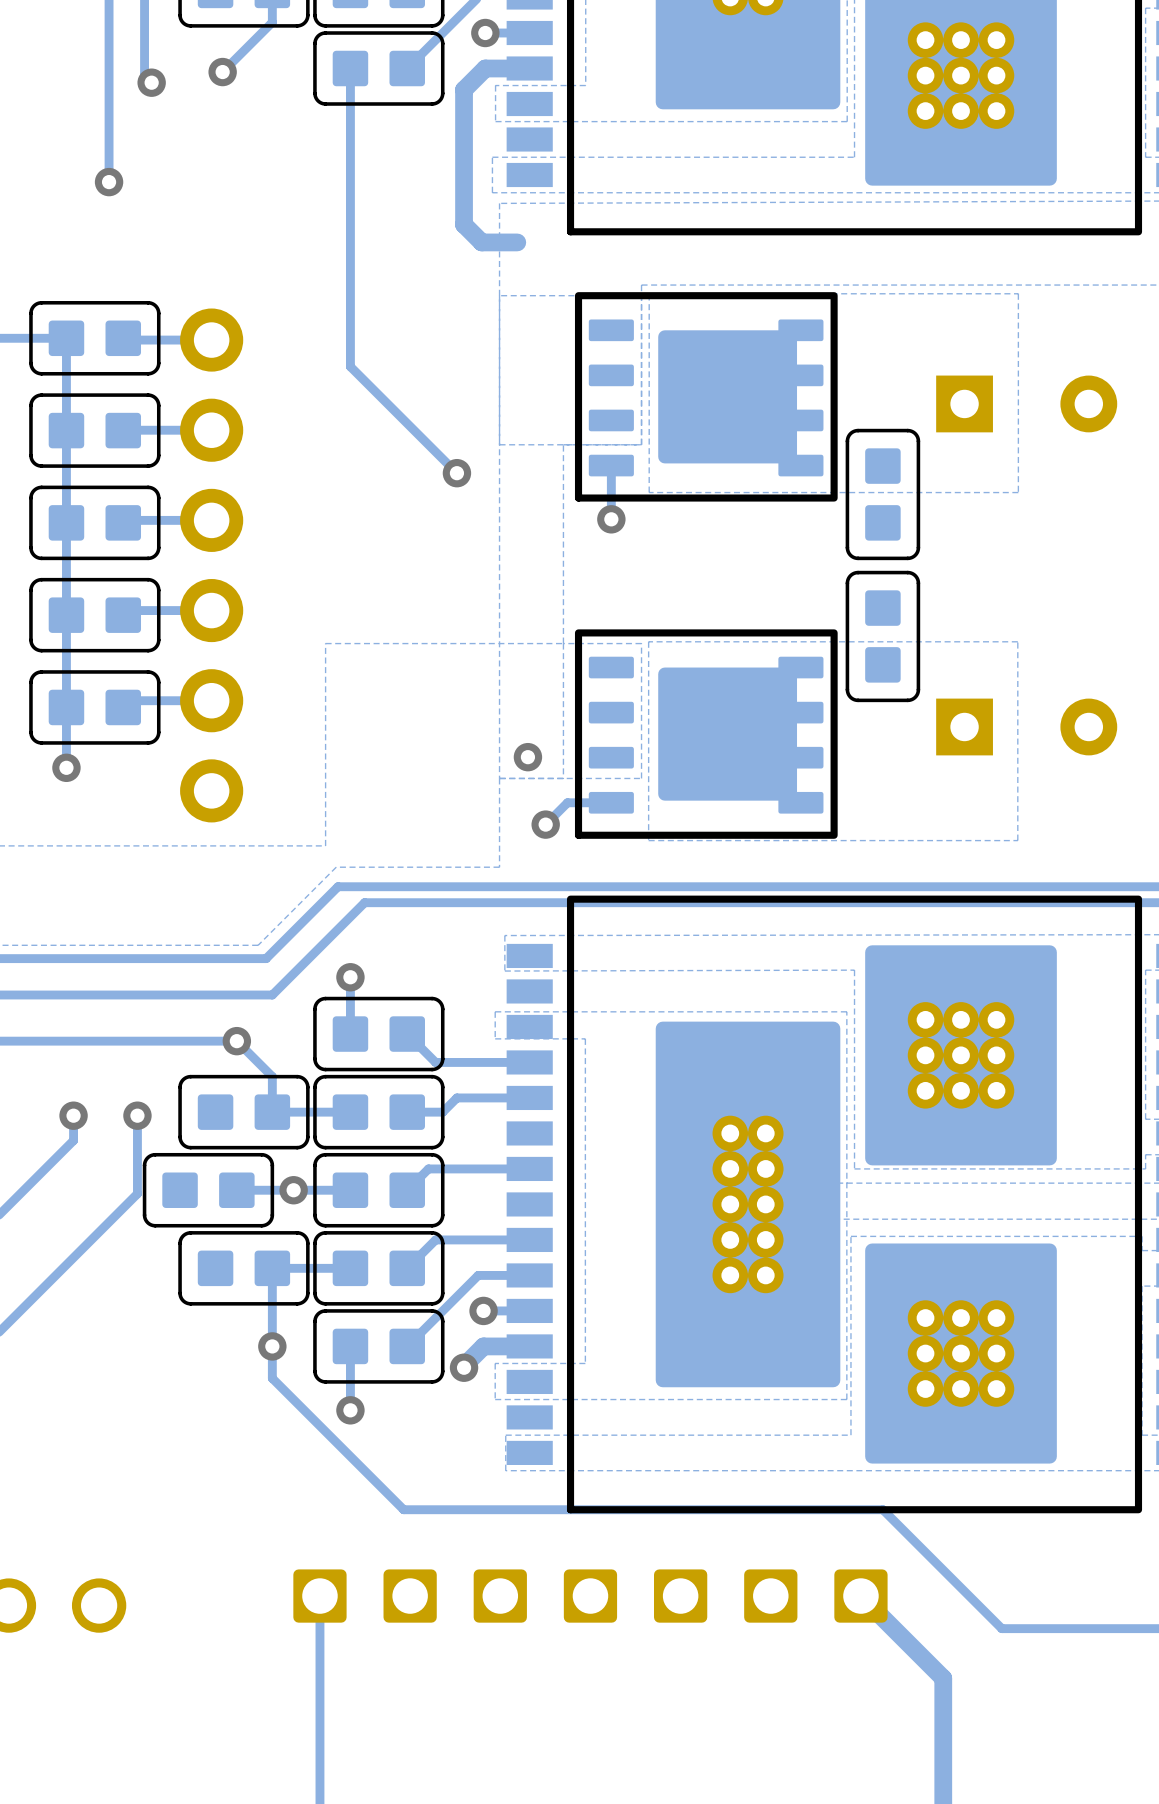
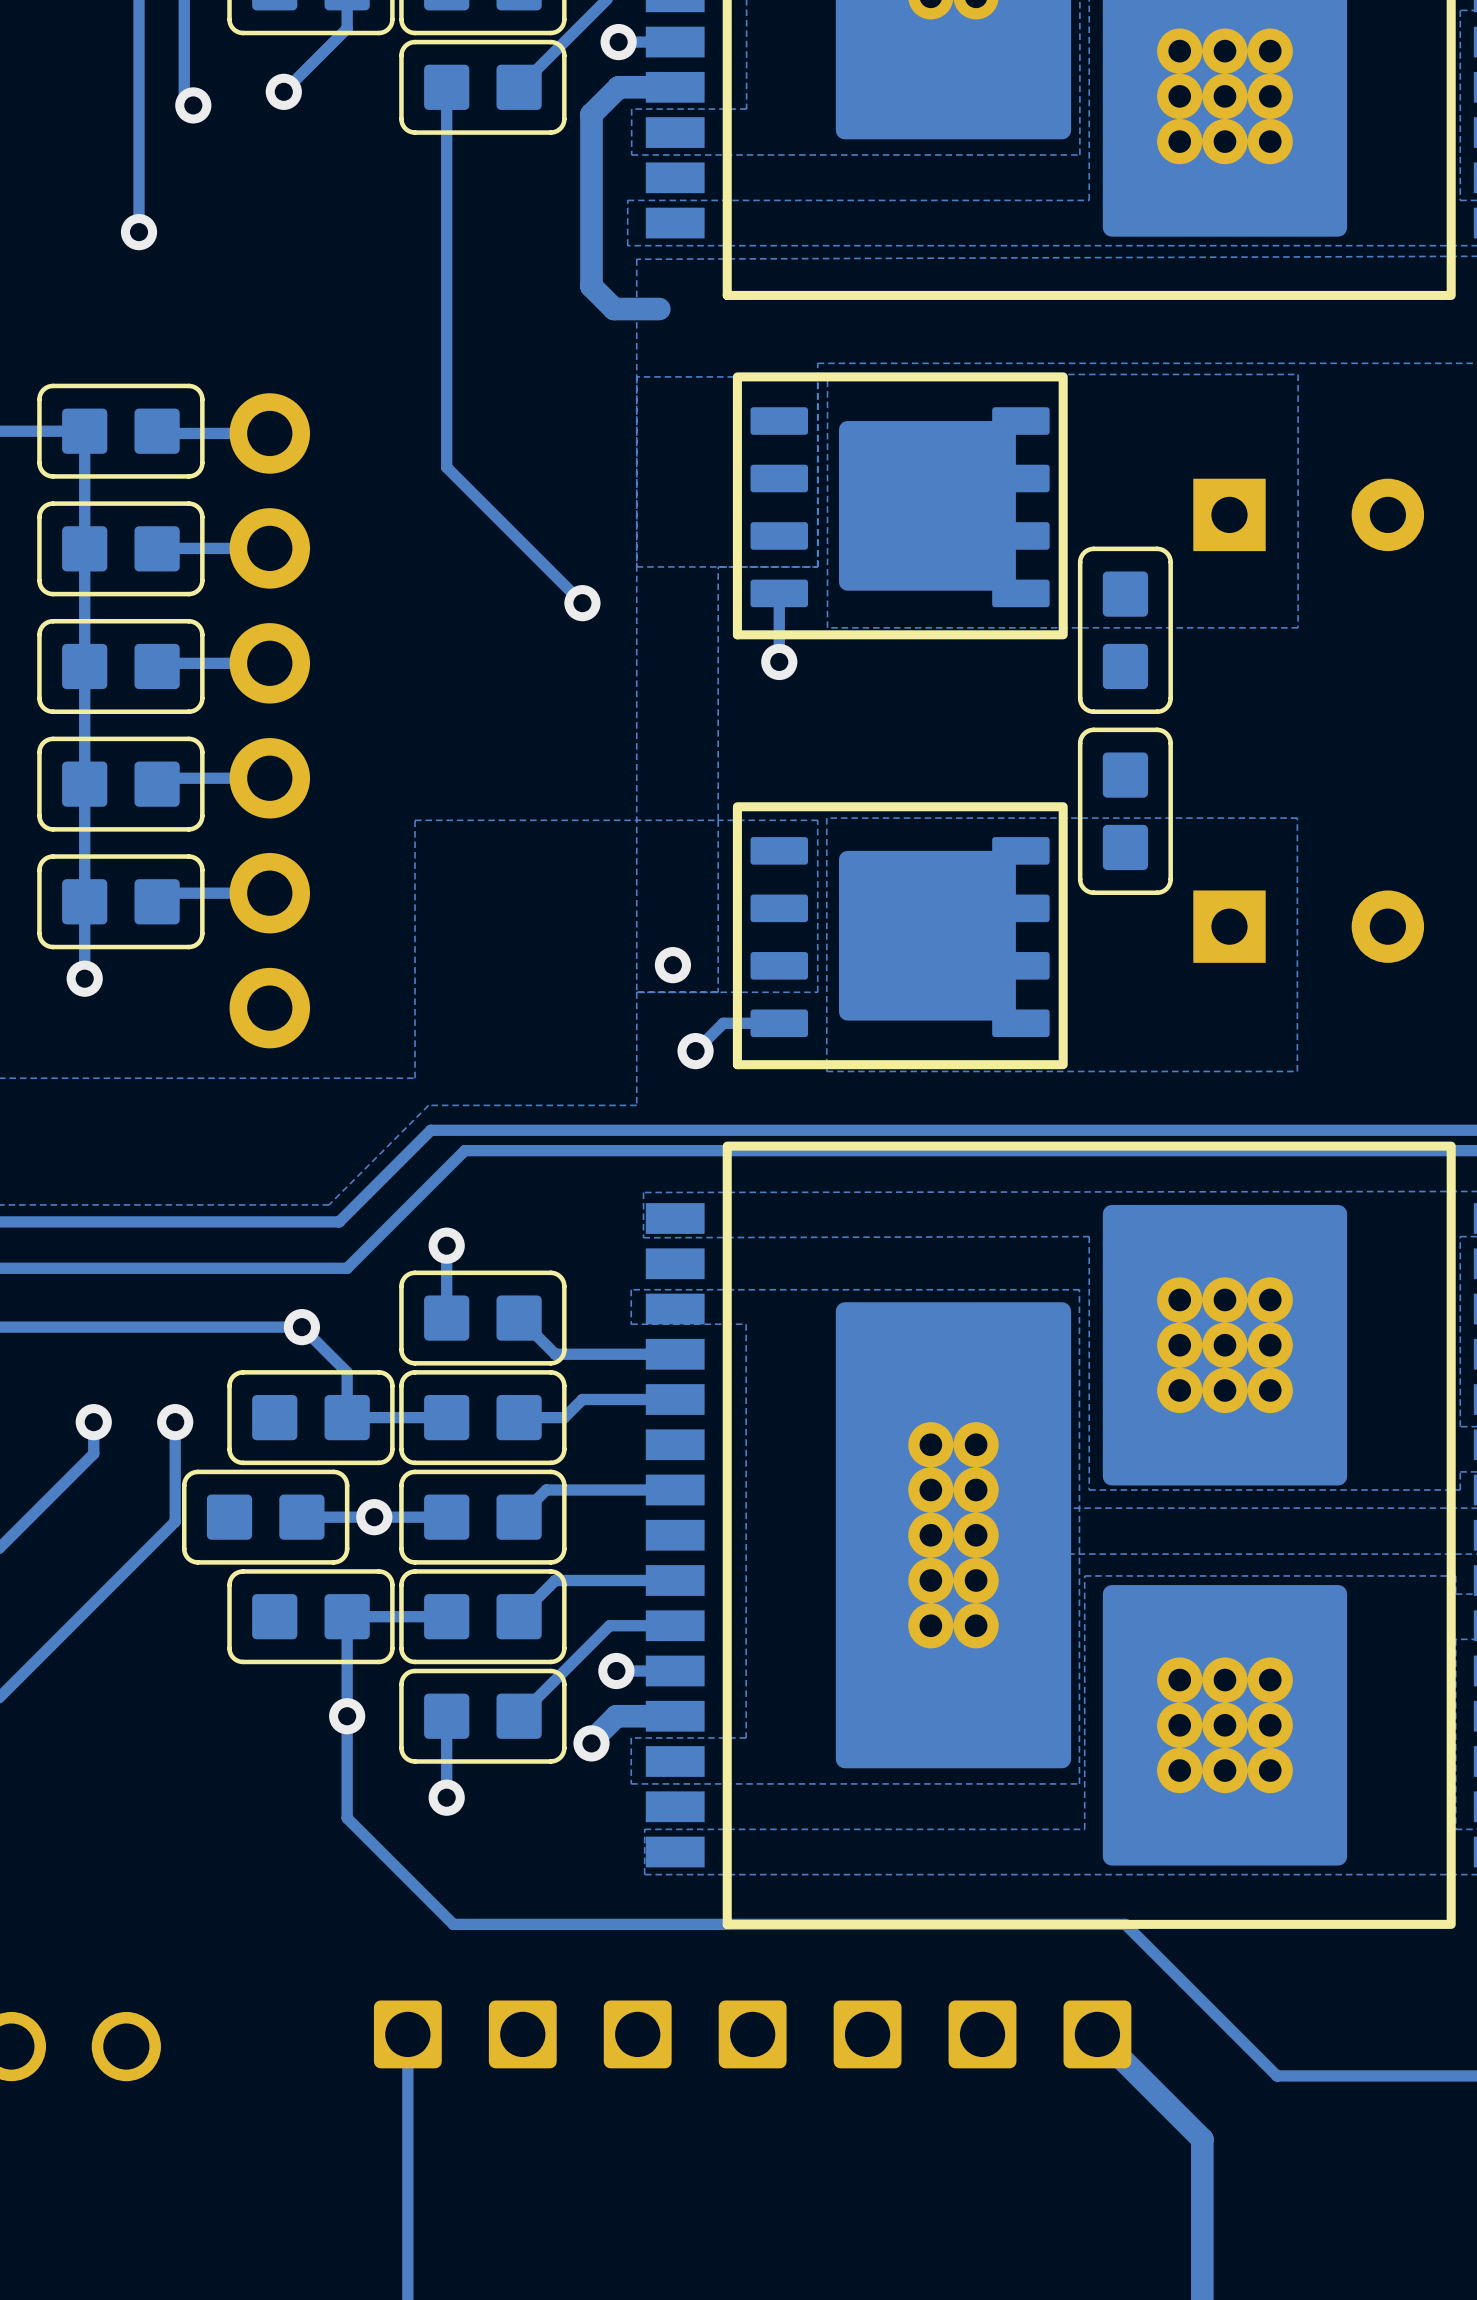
track: (272, 1378) (403, 1509) -> (347, 1756) (347, 1818) (453, 1924) (514, 1924)

